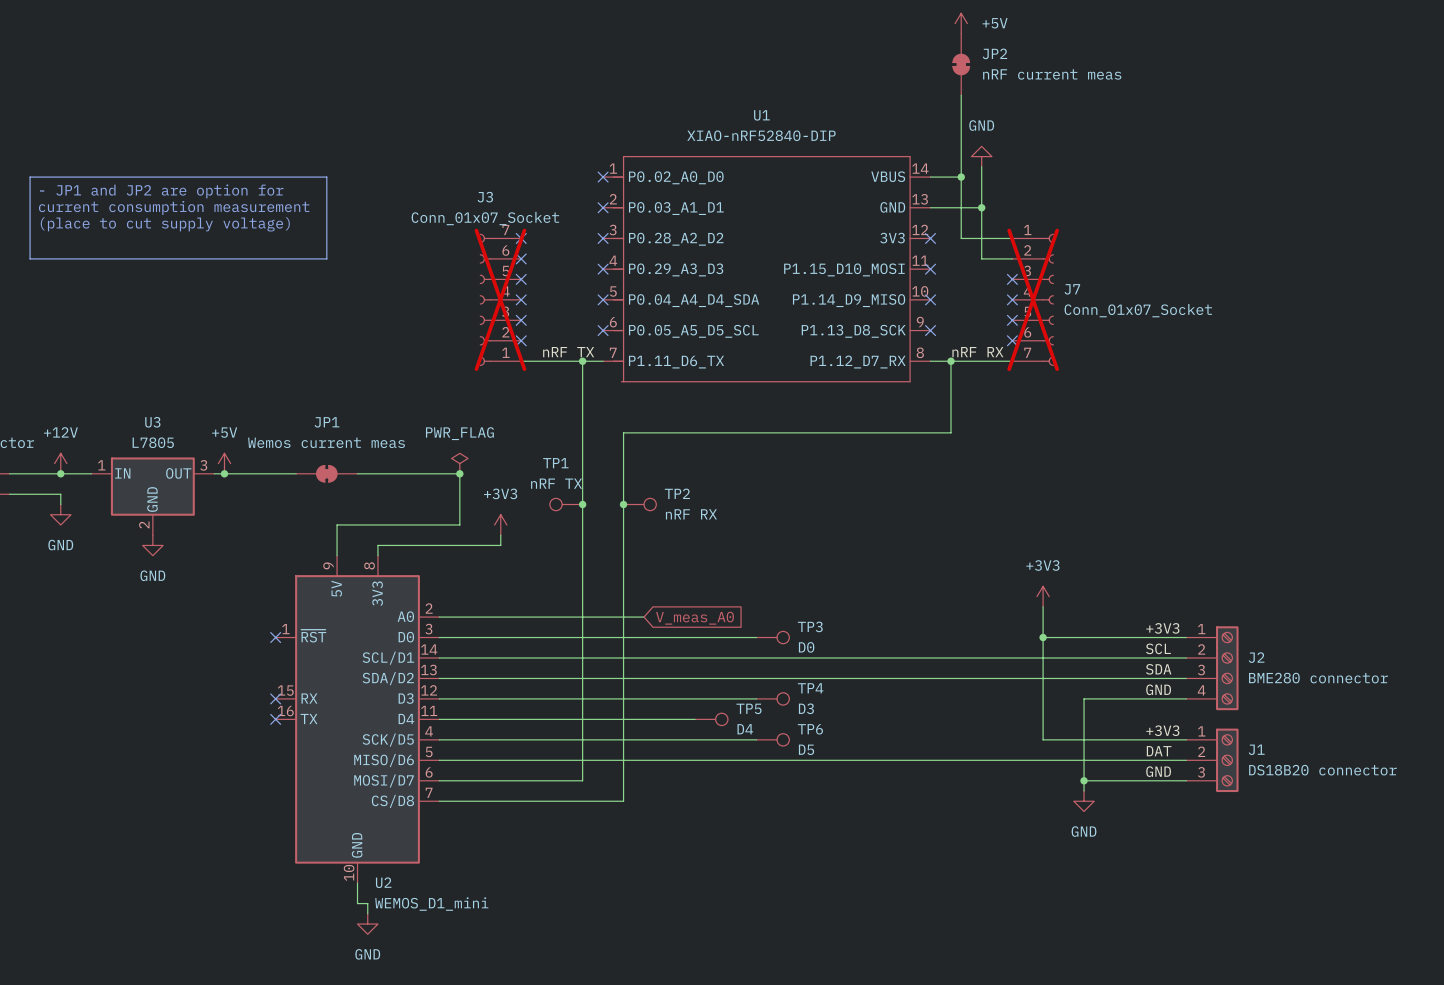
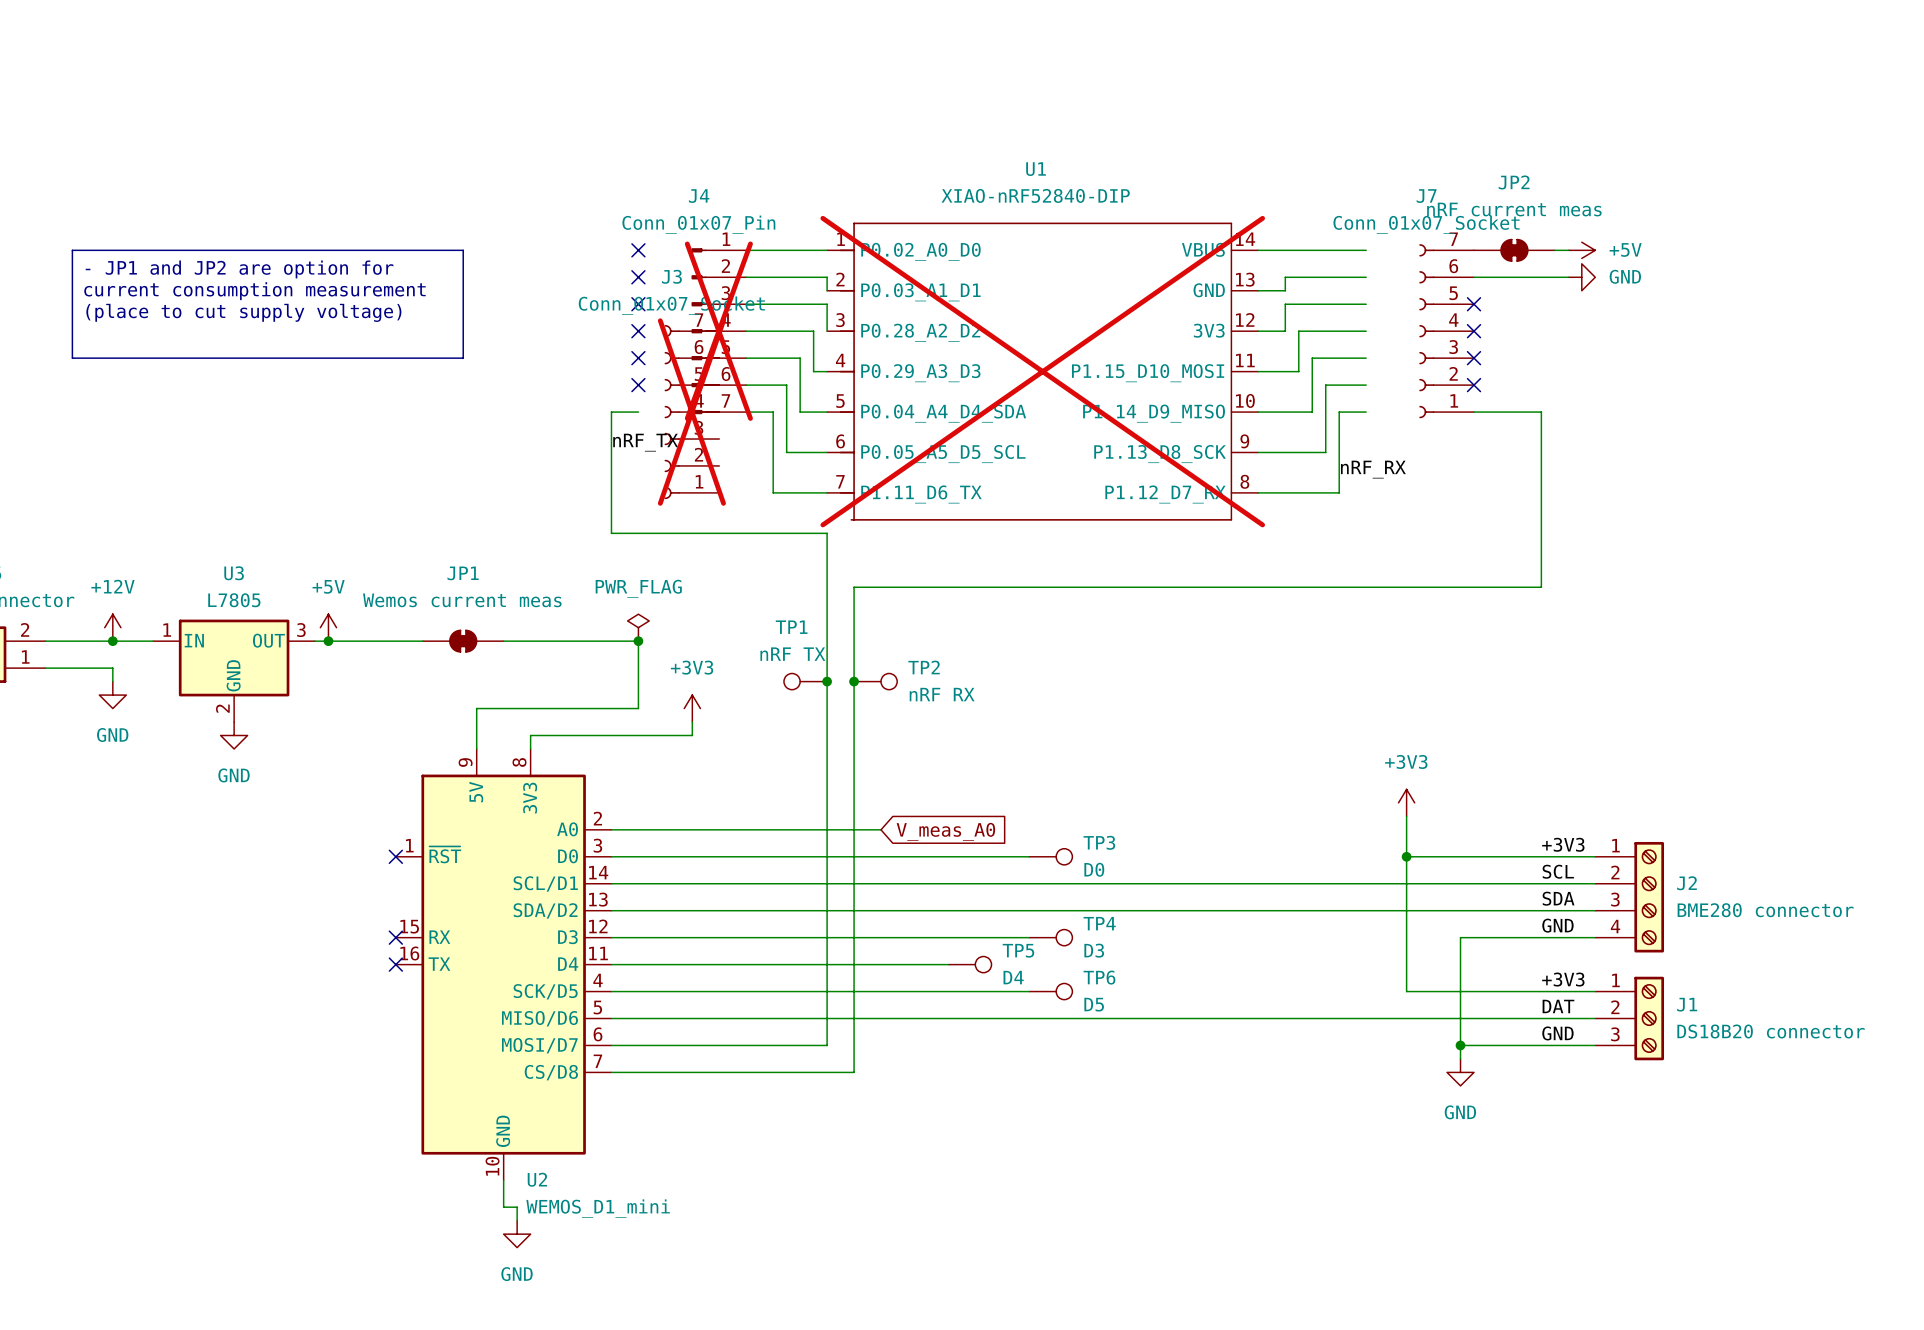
power symbol: +5V (961, 23) -> none
JP2 name position: JP2 (994, 53) -> JP2 (1514, 182)
JP2 rotation: 0° (961, 64) -> 90° clockwise (1514, 250)
JP2 position: (961, 64) -> (1514, 250)
JP2 value position: nRF current meas (1052, 74) -> nRF current meas (1514, 209)
wire: (961, 95) (961, 238) -> (1258, 371) (1298, 371) (1298, 331)
power symbol rotation: 0° (981, 156) -> 90° clockwise (1581, 277)
power symbol position: GND (981, 156) -> GND (1581, 277)
wire: (981, 166) (981, 258) -> (1258, 412) (1312, 412) (1312, 358) (1325, 358)
no-connect mark: none -> (638, 250)
wire: none -> (746, 250) (827, 250)
no-connect mark: (603, 177) -> none
wire: none -> (1298, 250) (1366, 250)
junction: (961, 177) -> none
wire: none -> (1554, 250) (1568, 250)
power symbol: none -> +5V (1581, 250)
no-connect mark: none -> (638, 277)
wire: none -> (746, 277) (827, 277) (827, 290)
wire: none -> (1473, 277) (1568, 277)
no-connect mark: (603, 207) -> none
wire: (951, 207) (981, 207) -> (1285, 290) (1285, 277) (1366, 277)
junction: (981, 207) -> none
no-connect mark: none -> (638, 304)
wire: none -> (746, 304) (827, 304) (827, 331)
wire: none -> (1366, 304) (1285, 304) (1285, 331) (1258, 331)
no-connect mark: none -> (1473, 304)
no-connect mark: none -> (638, 331)
J4: none -> Conn_01x07_Pin (718, 331)
no-connect mark: (521, 238) -> none
wire: none -> (746, 331) (813, 331) (813, 371) (827, 371)
no-connect mark: (603, 238) -> none
no-connect mark: (930, 238) -> none
no-connect mark: none -> (1473, 331)
no-connect mark: none -> (638, 358)
no-connect mark: (521, 258) -> none
wire: none -> (746, 358) (800, 358) (800, 412) (827, 412)
no-connect mark: none -> (1473, 358)
no-connect mark: (603, 269) -> none
U1 do-not-place cross: none -> (1042, 371)
no-connect mark: (930, 269) -> none
no-connect mark: none -> (638, 385)
no-connect mark: (521, 279) -> none
wire: none -> (746, 385) (786, 385) (786, 452) (827, 452)
wire: none -> (1366, 385) (1325, 385) (1325, 452) (1258, 452)
no-connect mark: (1012, 279) -> none
no-connect mark: none -> (1473, 385)
J7 name position: J7 (1072, 289) -> J7 (1426, 196)
no-connect mark: (521, 299) -> none
no-connect mark: (603, 299) -> none
no-connect mark: (930, 299) -> none
no-connect mark: (1012, 299) -> none
J7 do-not-place cross: (1033, 299) -> none
J7 rotation: 0° (1048, 299) -> 180° (1426, 331)
J7 value position: Conn_01x07_Socket (1138, 310) -> Conn_01x07_Socket (1426, 224)
no-connect mark: (521, 320) -> none
no-connect mark: (1012, 320) -> none
label: none -> nRF_TX (645, 442)
no-connect mark: (603, 330) -> none
no-connect mark: (930, 330) -> none
no-connect mark: (521, 340) -> none
no-connect mark: (1012, 340) -> none
label: nRF TX (568, 352) -> none
label: nRF RX (977, 352) -> nRF_RX (1373, 469)
wire: (521, 361) (562, 361) -> (746, 412) (773, 412) (773, 492)
wire: (582, 361) (582, 780) -> (638, 412) (611, 412) (611, 533) (827, 533) (827, 1045) (800, 1045)
junction: (582, 361) -> none
wire: (951, 361) (951, 432) -> (1473, 412) (1541, 412) (1541, 587) (1285, 587)
junction: (951, 361) -> none
wire: (991, 361) (1012, 361) -> (1339, 492) (1339, 412) (1366, 412)
TP1 position: (566, 504) -> (805, 681)
junction position: (582, 504) -> (827, 681)

